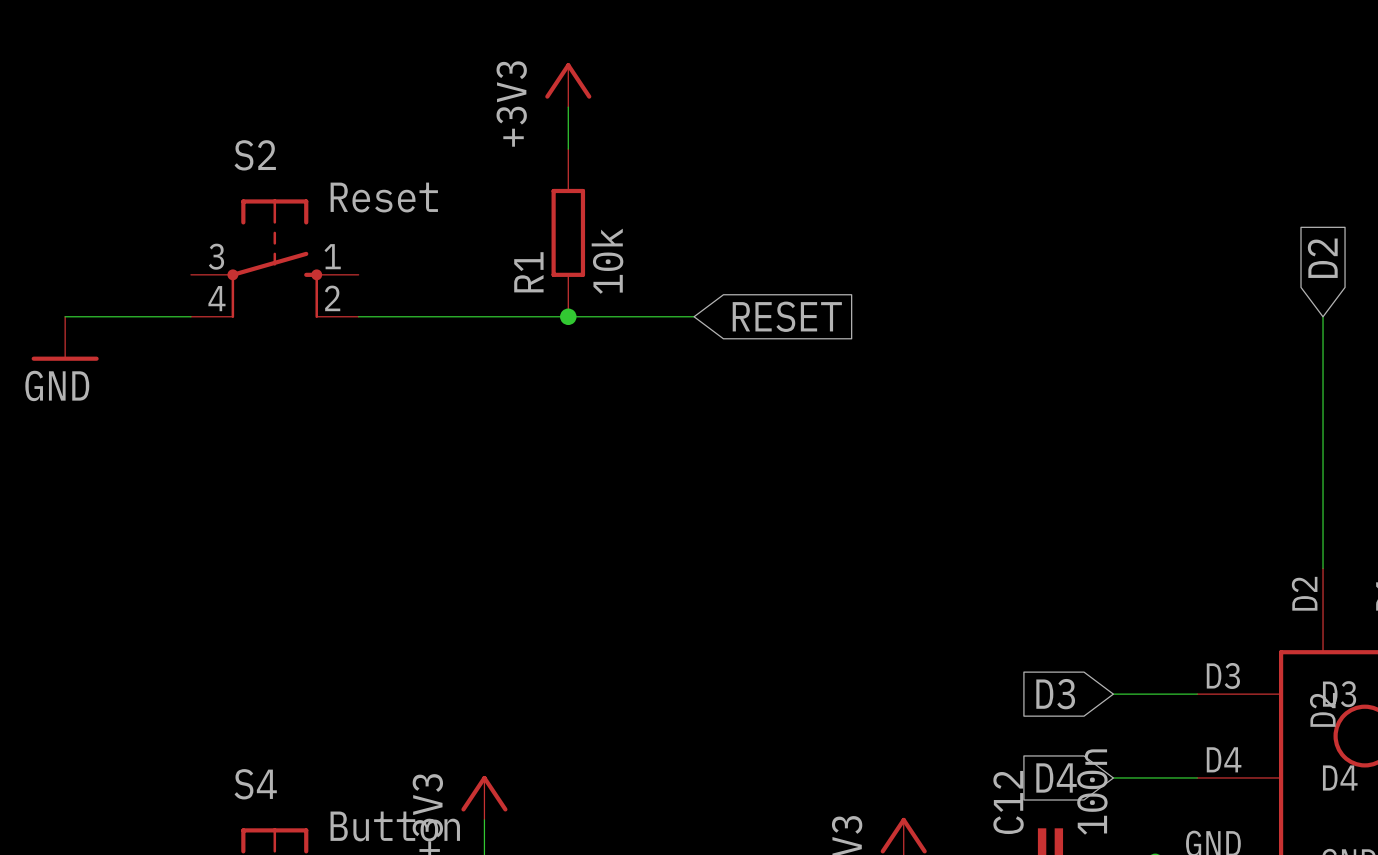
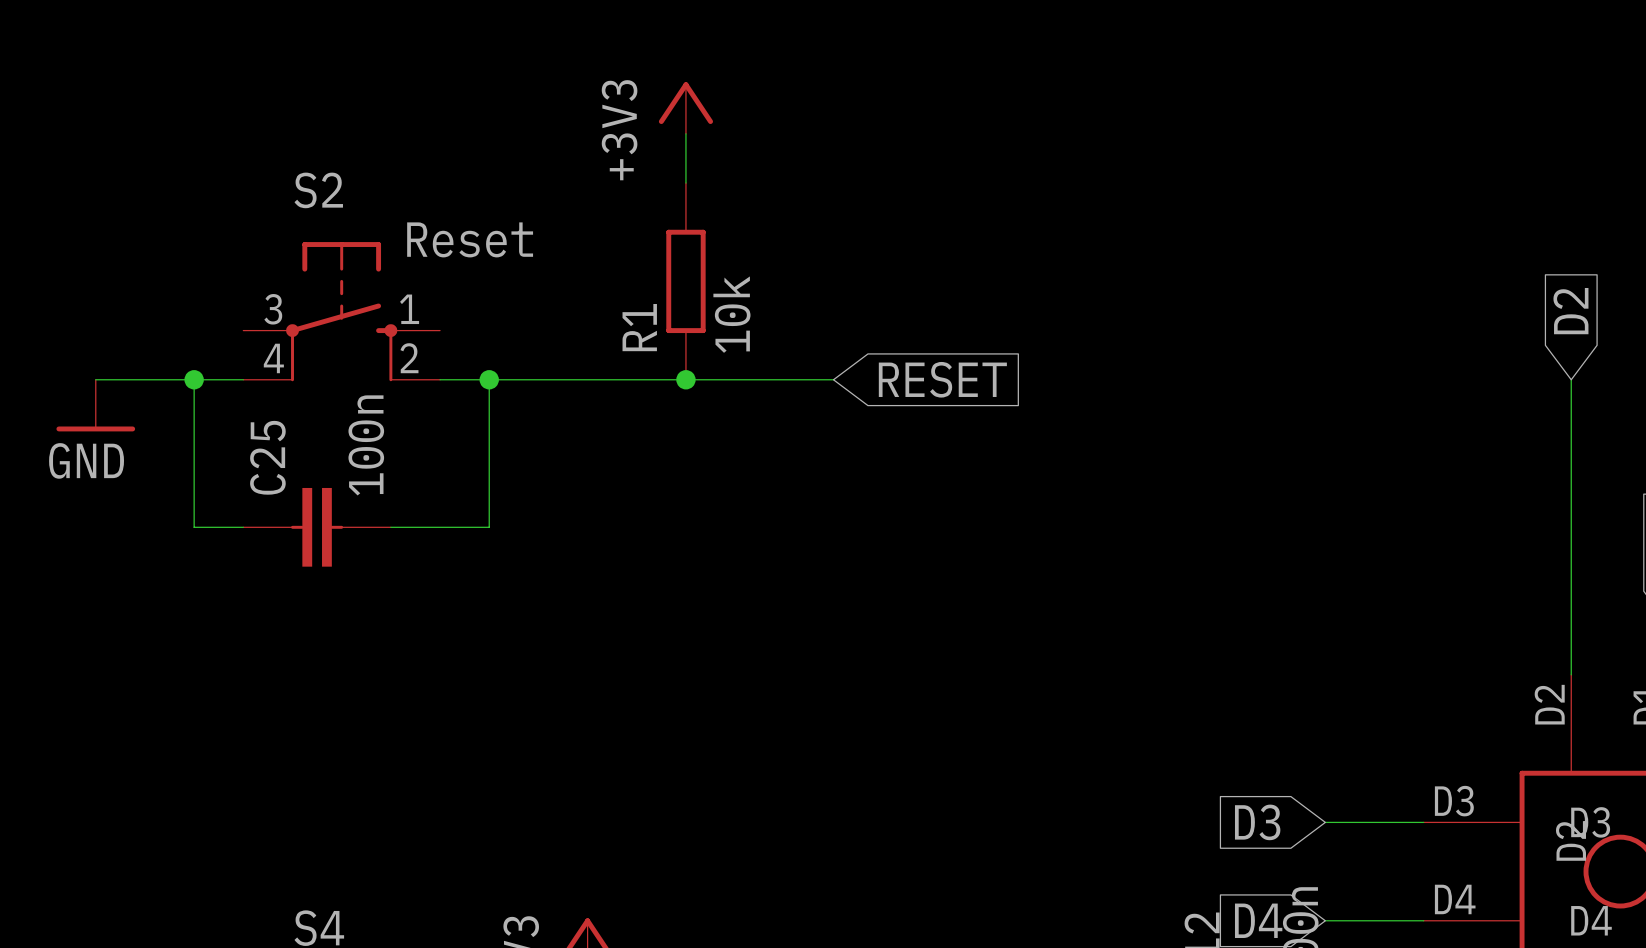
wire: none -> (194, 379) (194, 527) (243, 527)
junction: none -> (194, 379)
wire: none -> (489, 379) (489, 527) (390, 527)
junction: none -> (489, 379)
C25: none -> 100n (317, 527)

